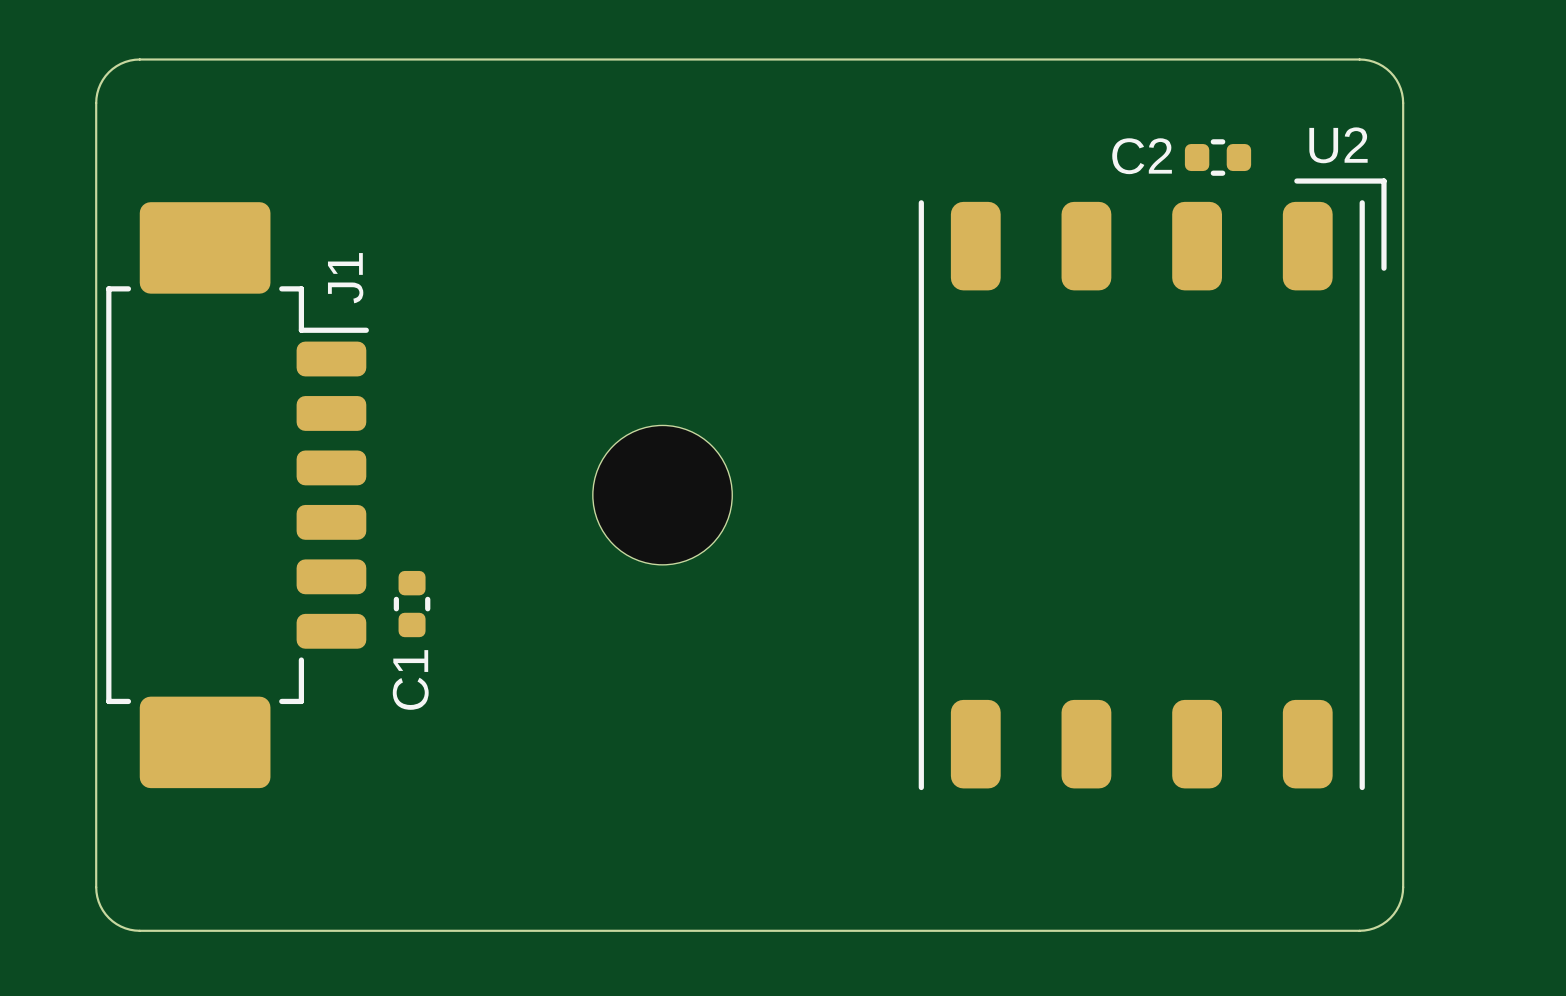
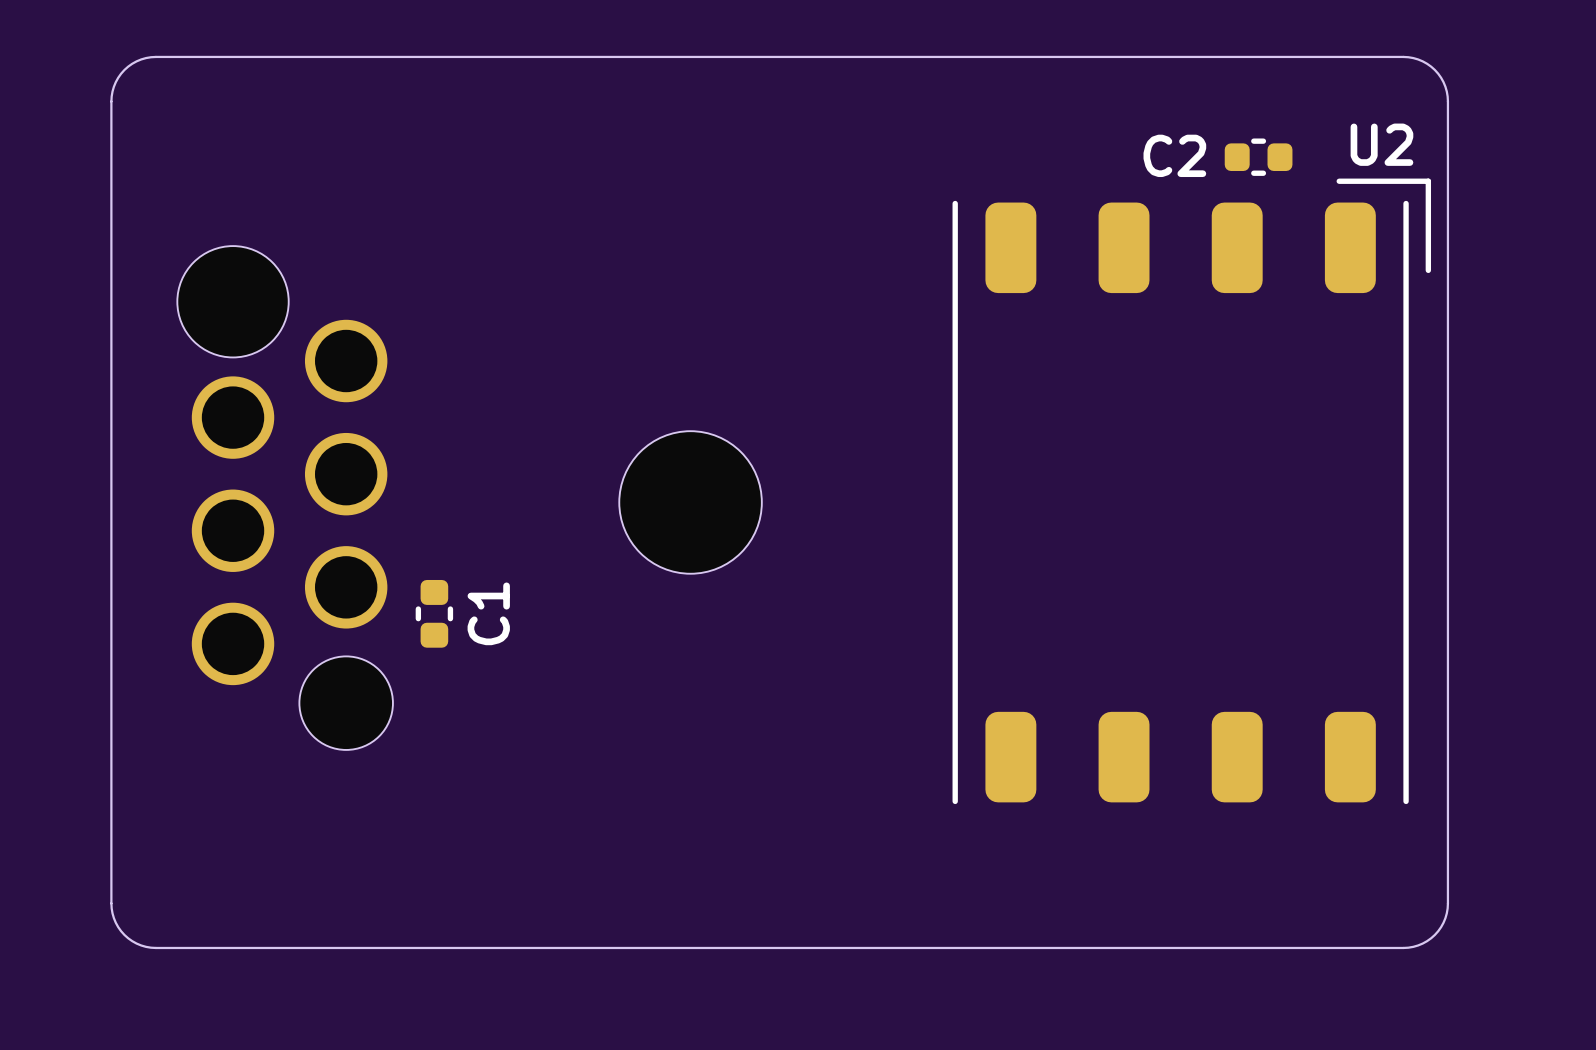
part: none -> (285, 498)
J1: (237, 495) -> none
C1 name position: C1 (410, 679) -> C1 (488, 613)

